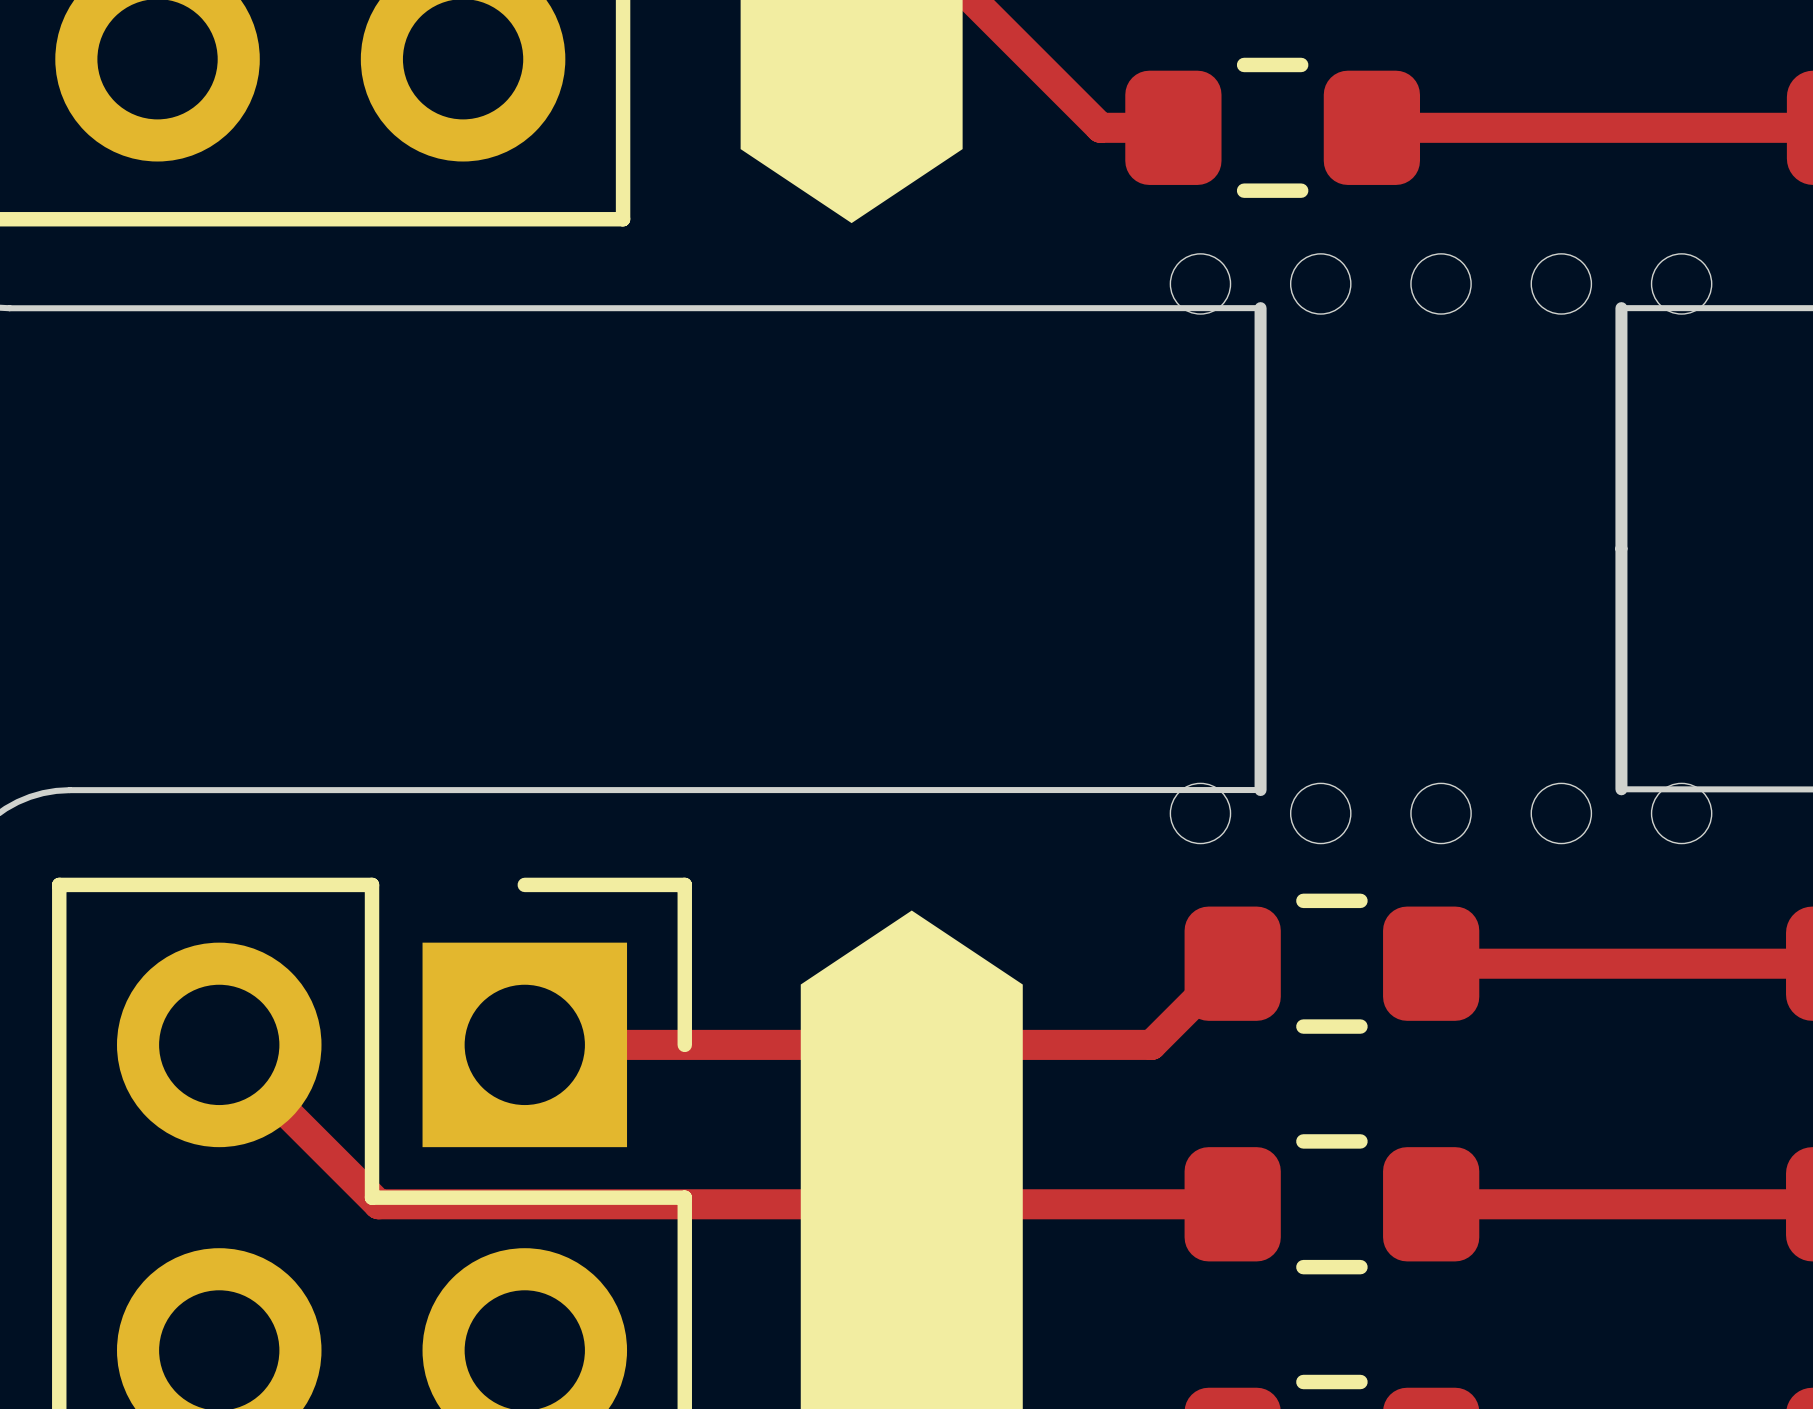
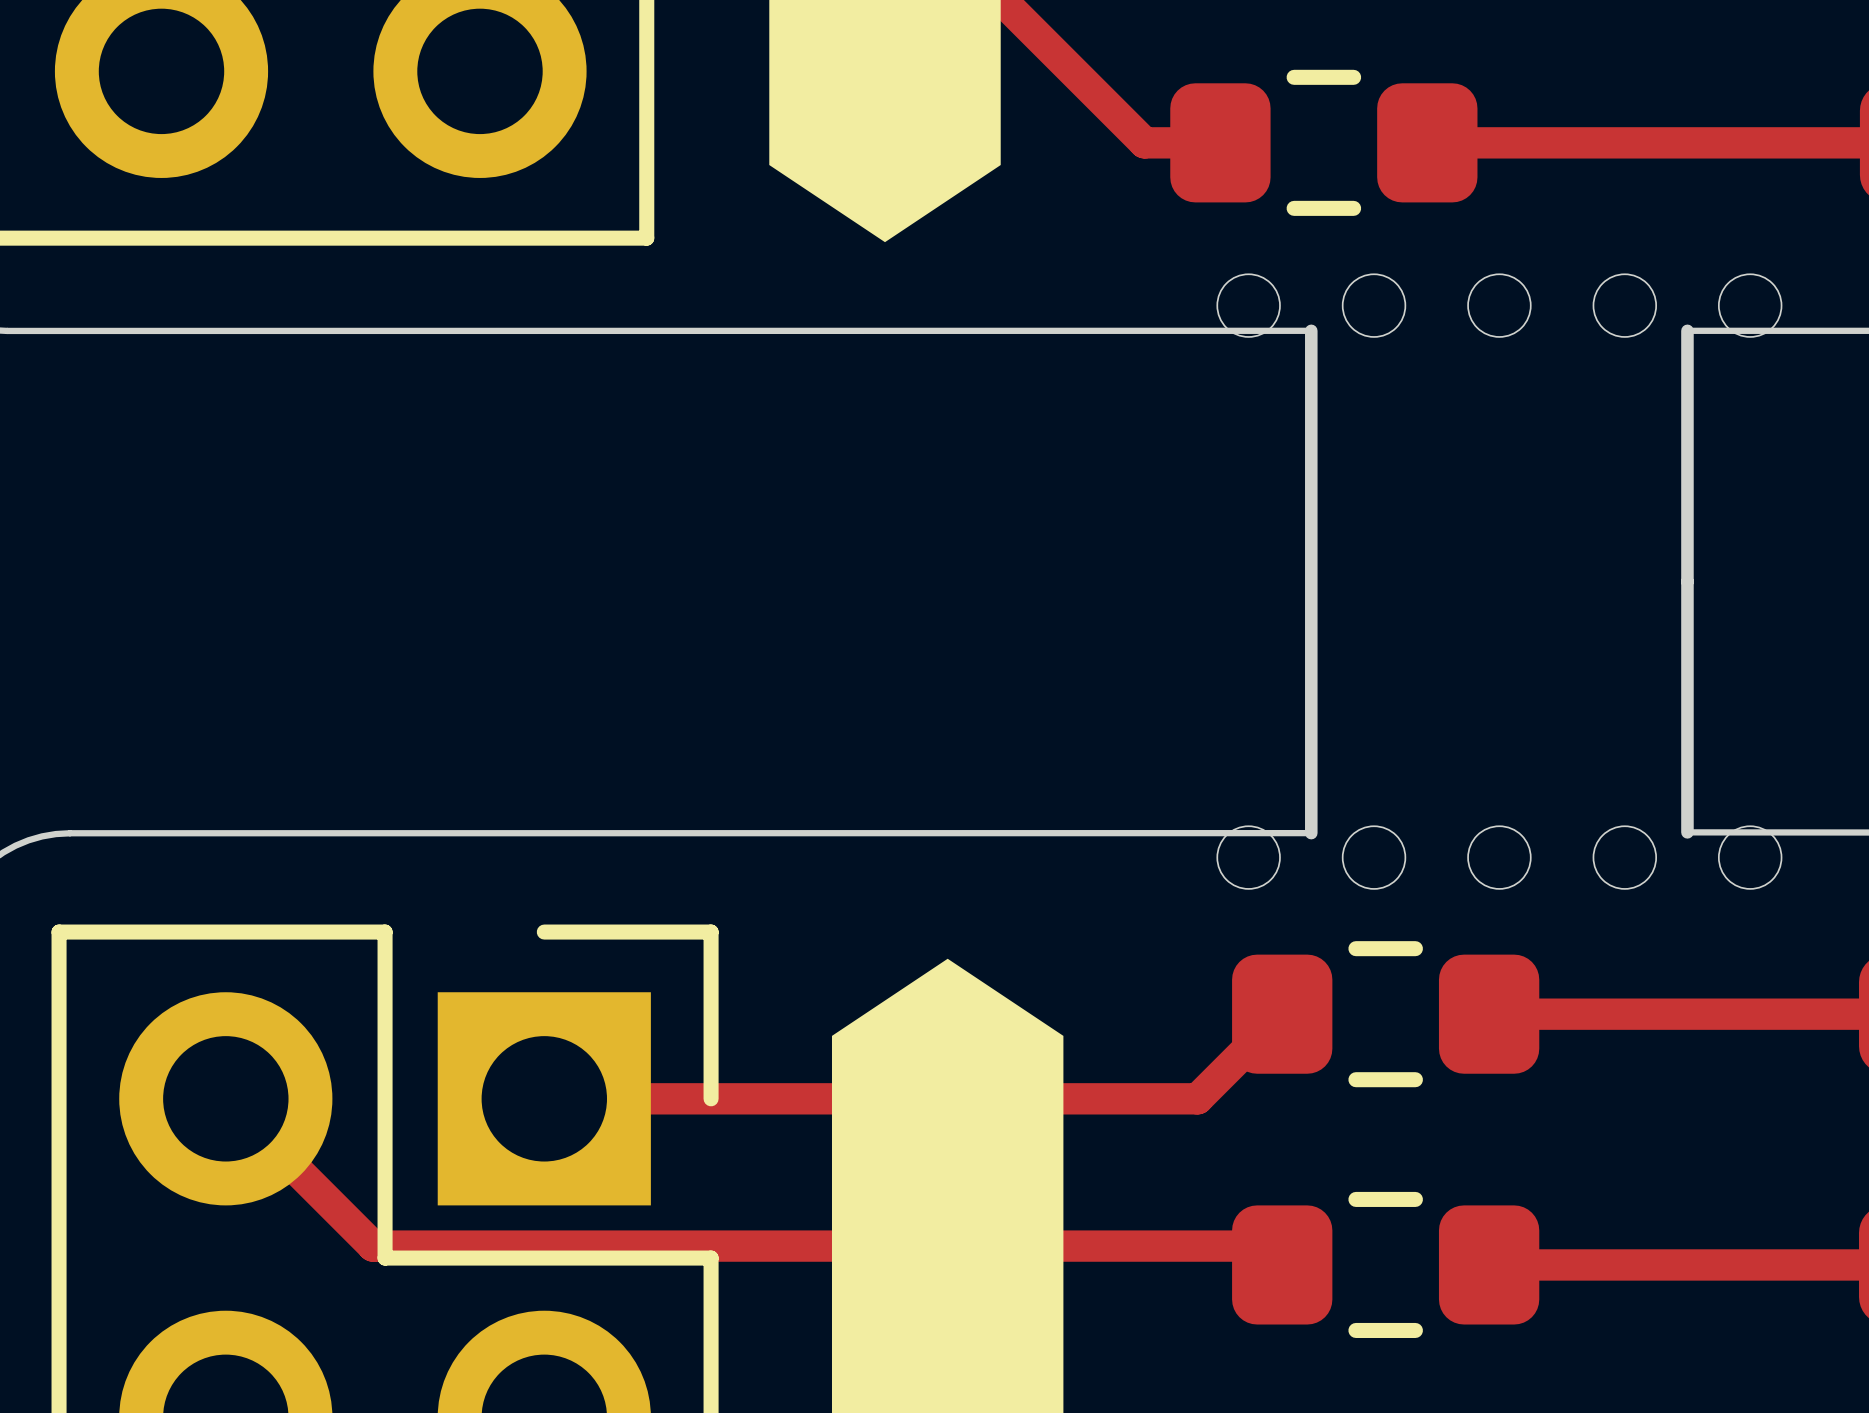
track: (360, 1186) (378, 1204) (1232, 1204) -> (373, 1246) (1263, 1246) (1282, 1264)

